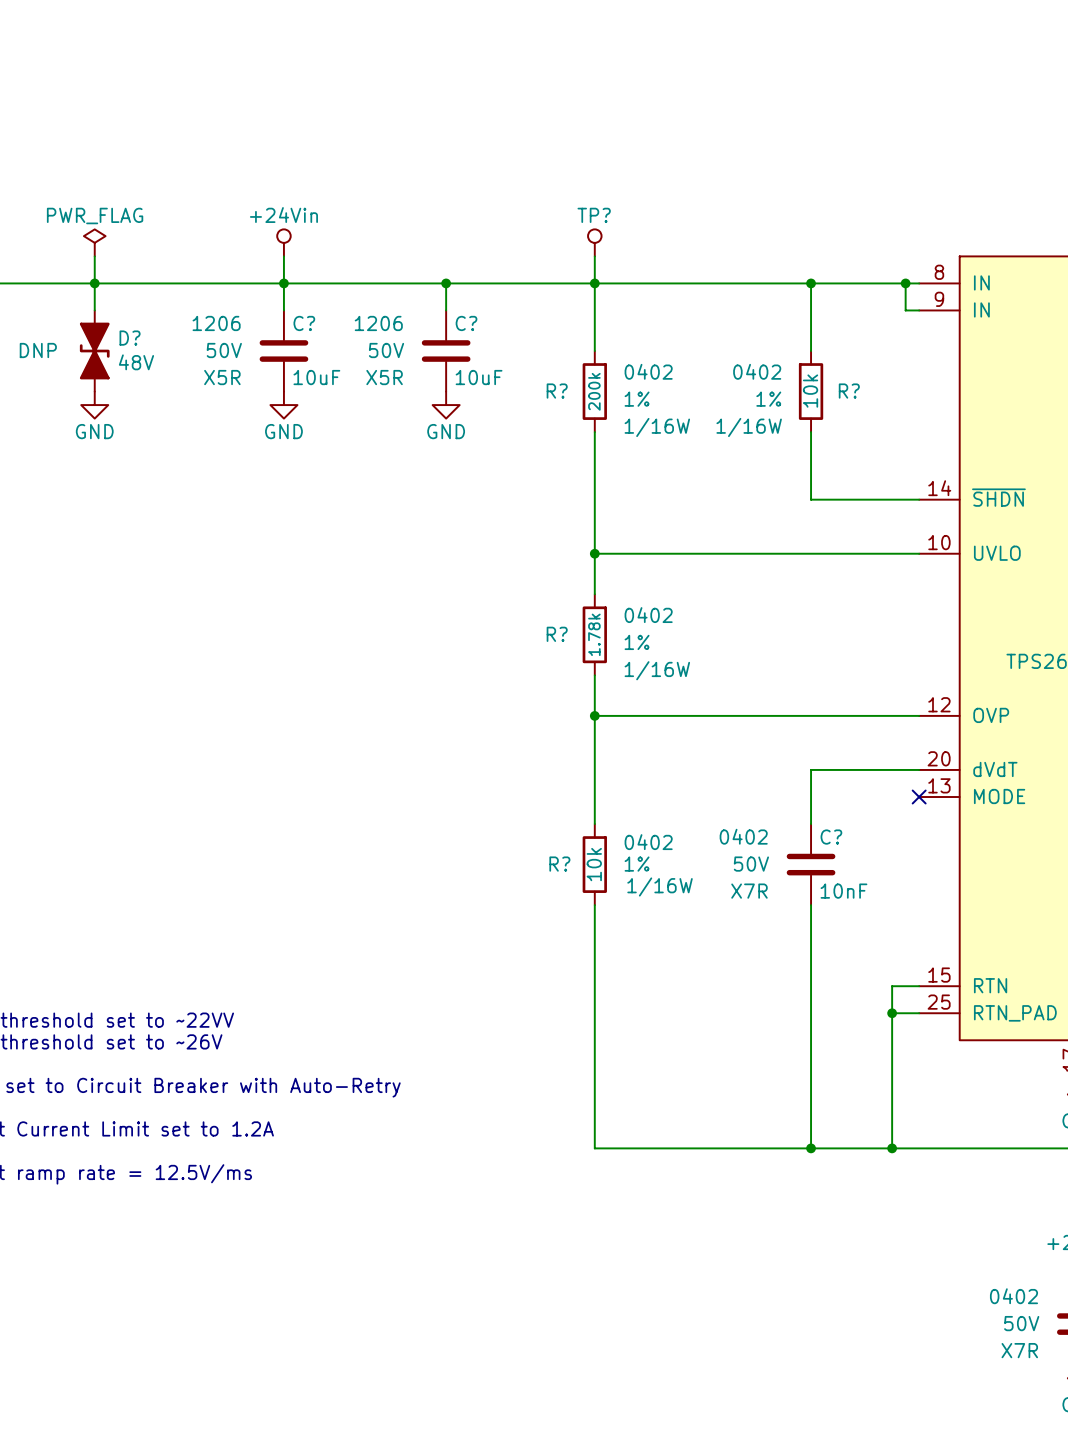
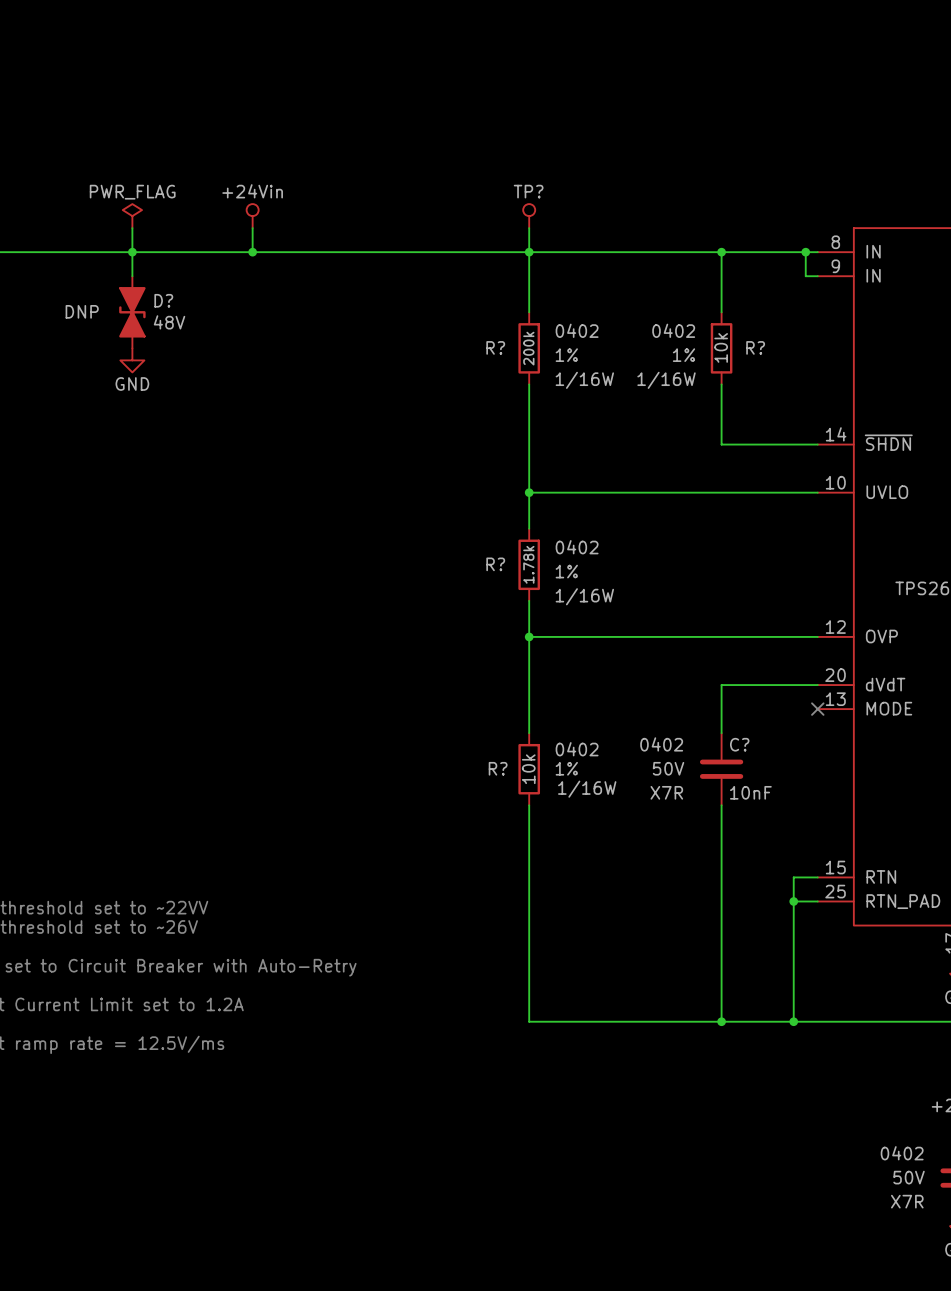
power symbol position: PWR_FLAG (94, 242) -> PWR_FLAG (132, 216)
wire: (94, 256) (94, 310) -> (132, 228) (132, 276)
junction position: (94, 283) -> (132, 252)
wire: (283, 283) (283, 310) -> none
wire: (446, 283) (446, 310) -> none
junction: (446, 283) -> none
D? position: (94, 351) -> (132, 312)
C?: 10uF (283, 351) -> none
C?: 10uF (446, 351) -> none
power symbol position: GND (94, 405) -> GND (132, 360)
power symbol: GND (283, 405) -> none
power symbol: GND (446, 405) -> none

